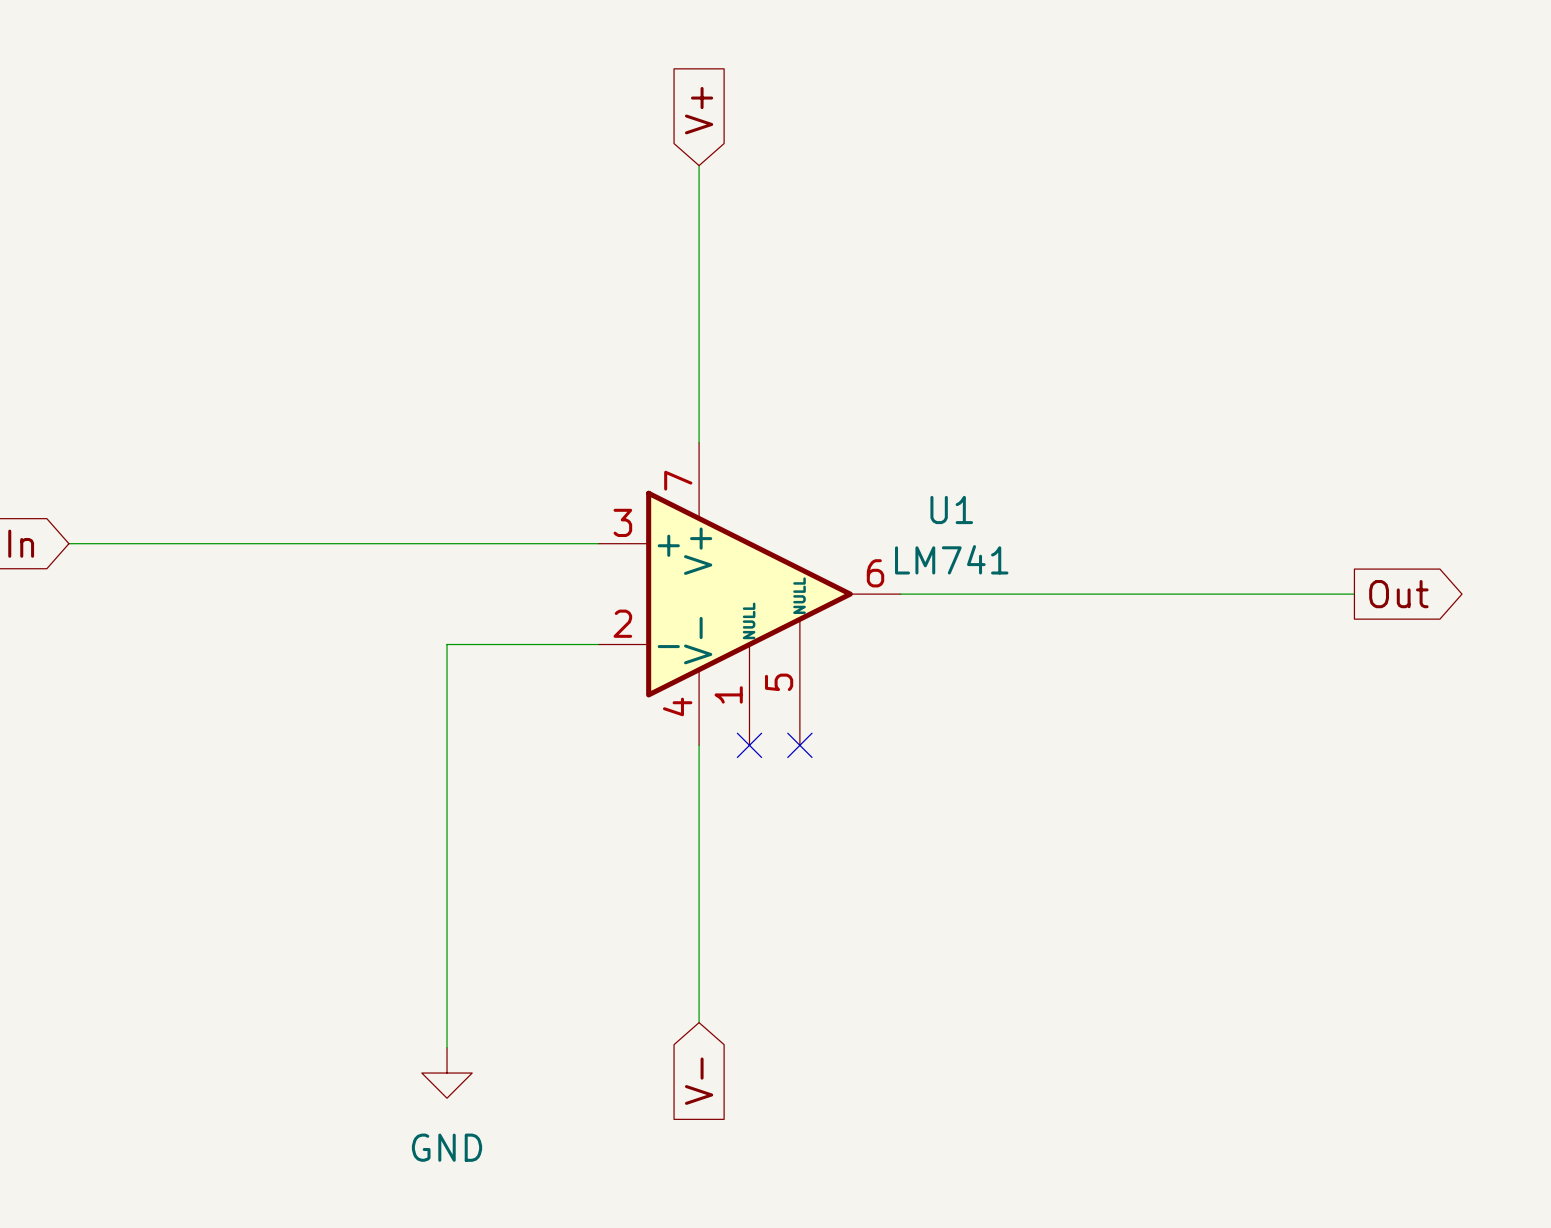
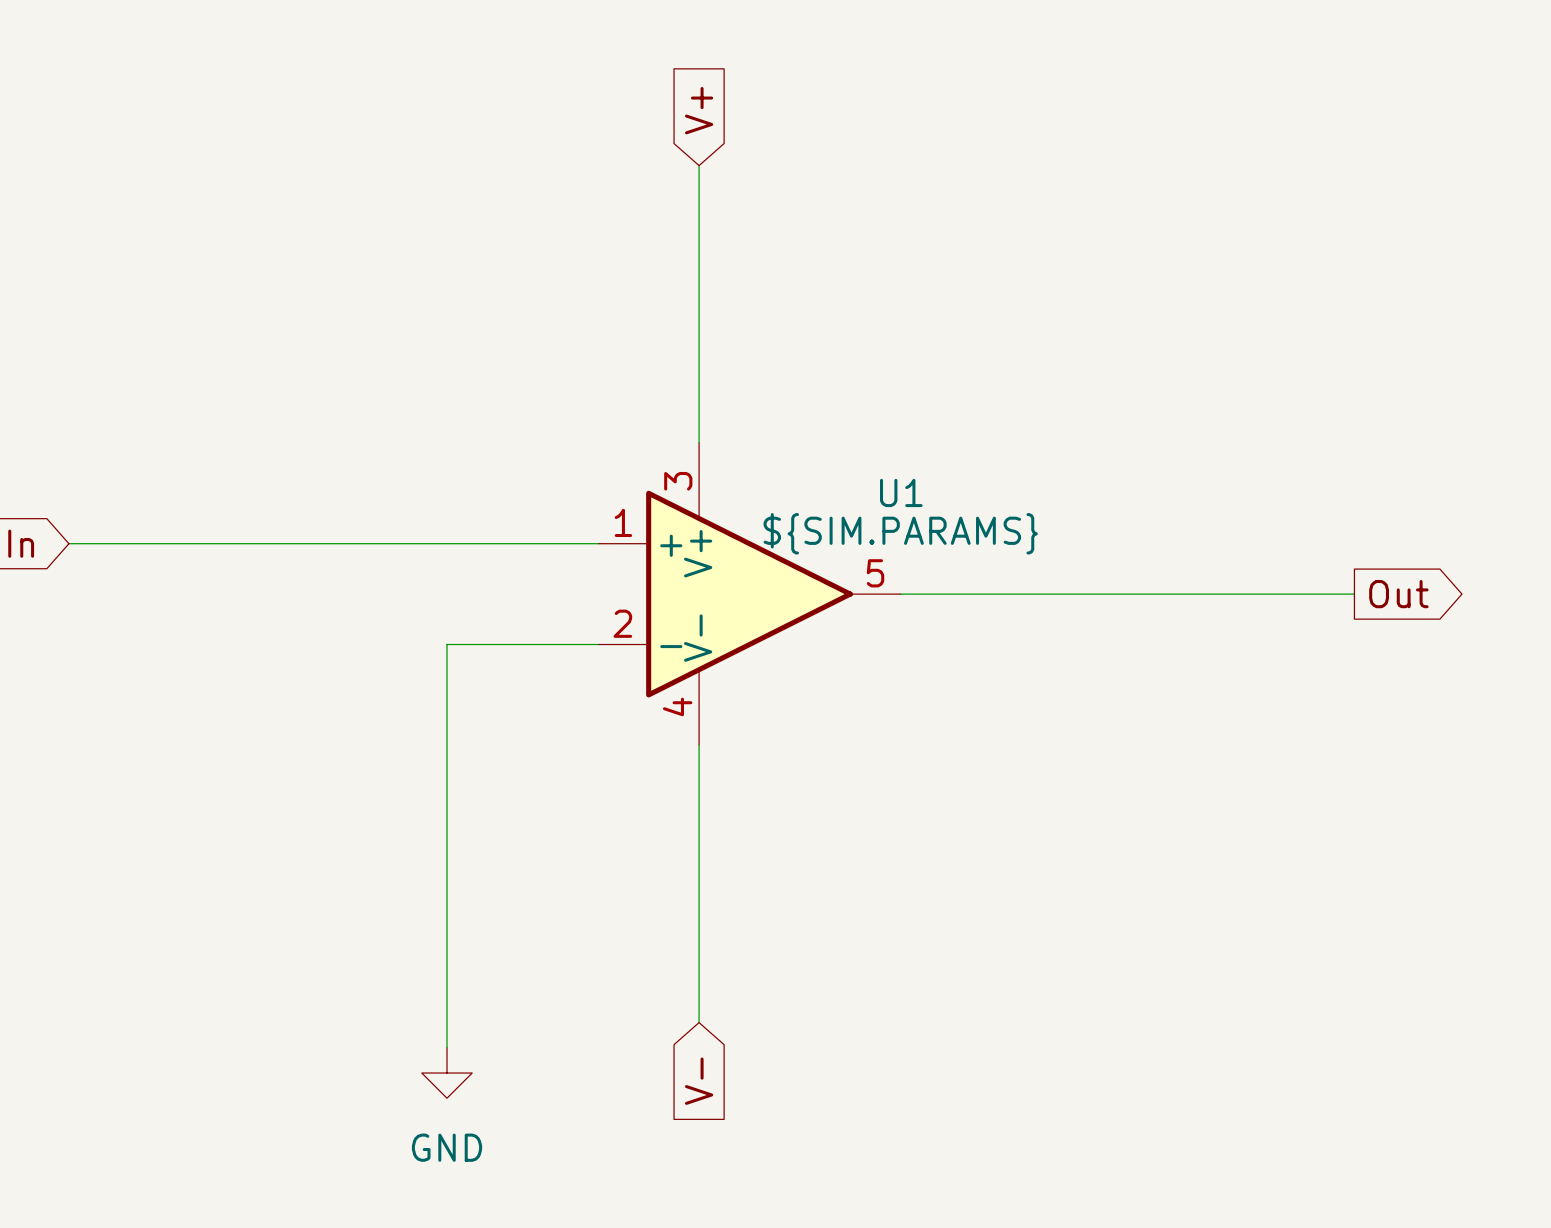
U1 symbol: [598, 442, 901, 746] -> [598, 442, 901, 746]
U1 name position: U1 (951, 509) -> U1 (901, 492)
U1 value: LM741 (951, 559) -> ${SIM.PARAMS} (900, 533)
no-connect mark: (749, 745) -> none
no-connect mark: (799, 745) -> none

